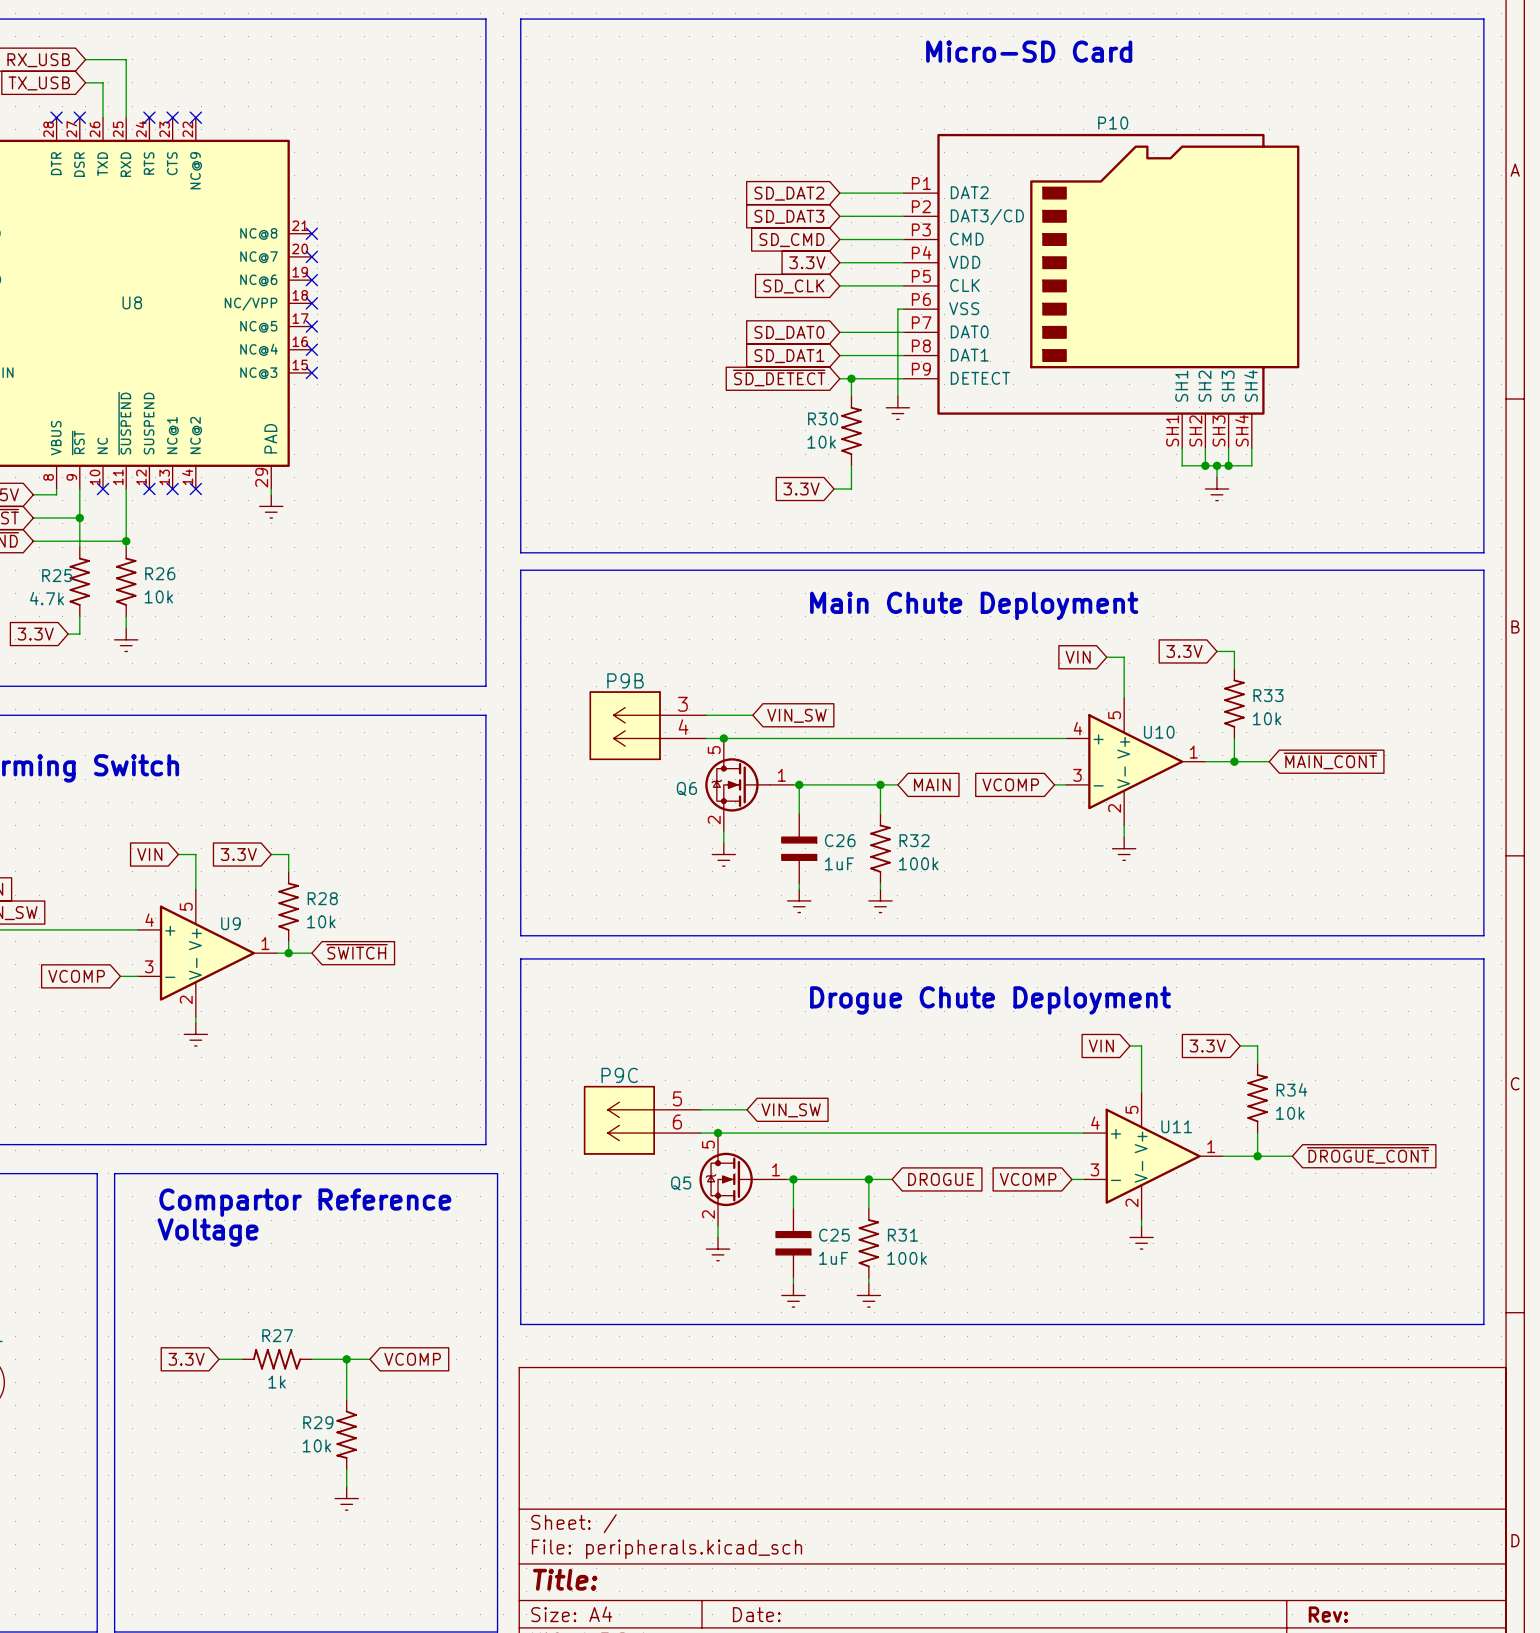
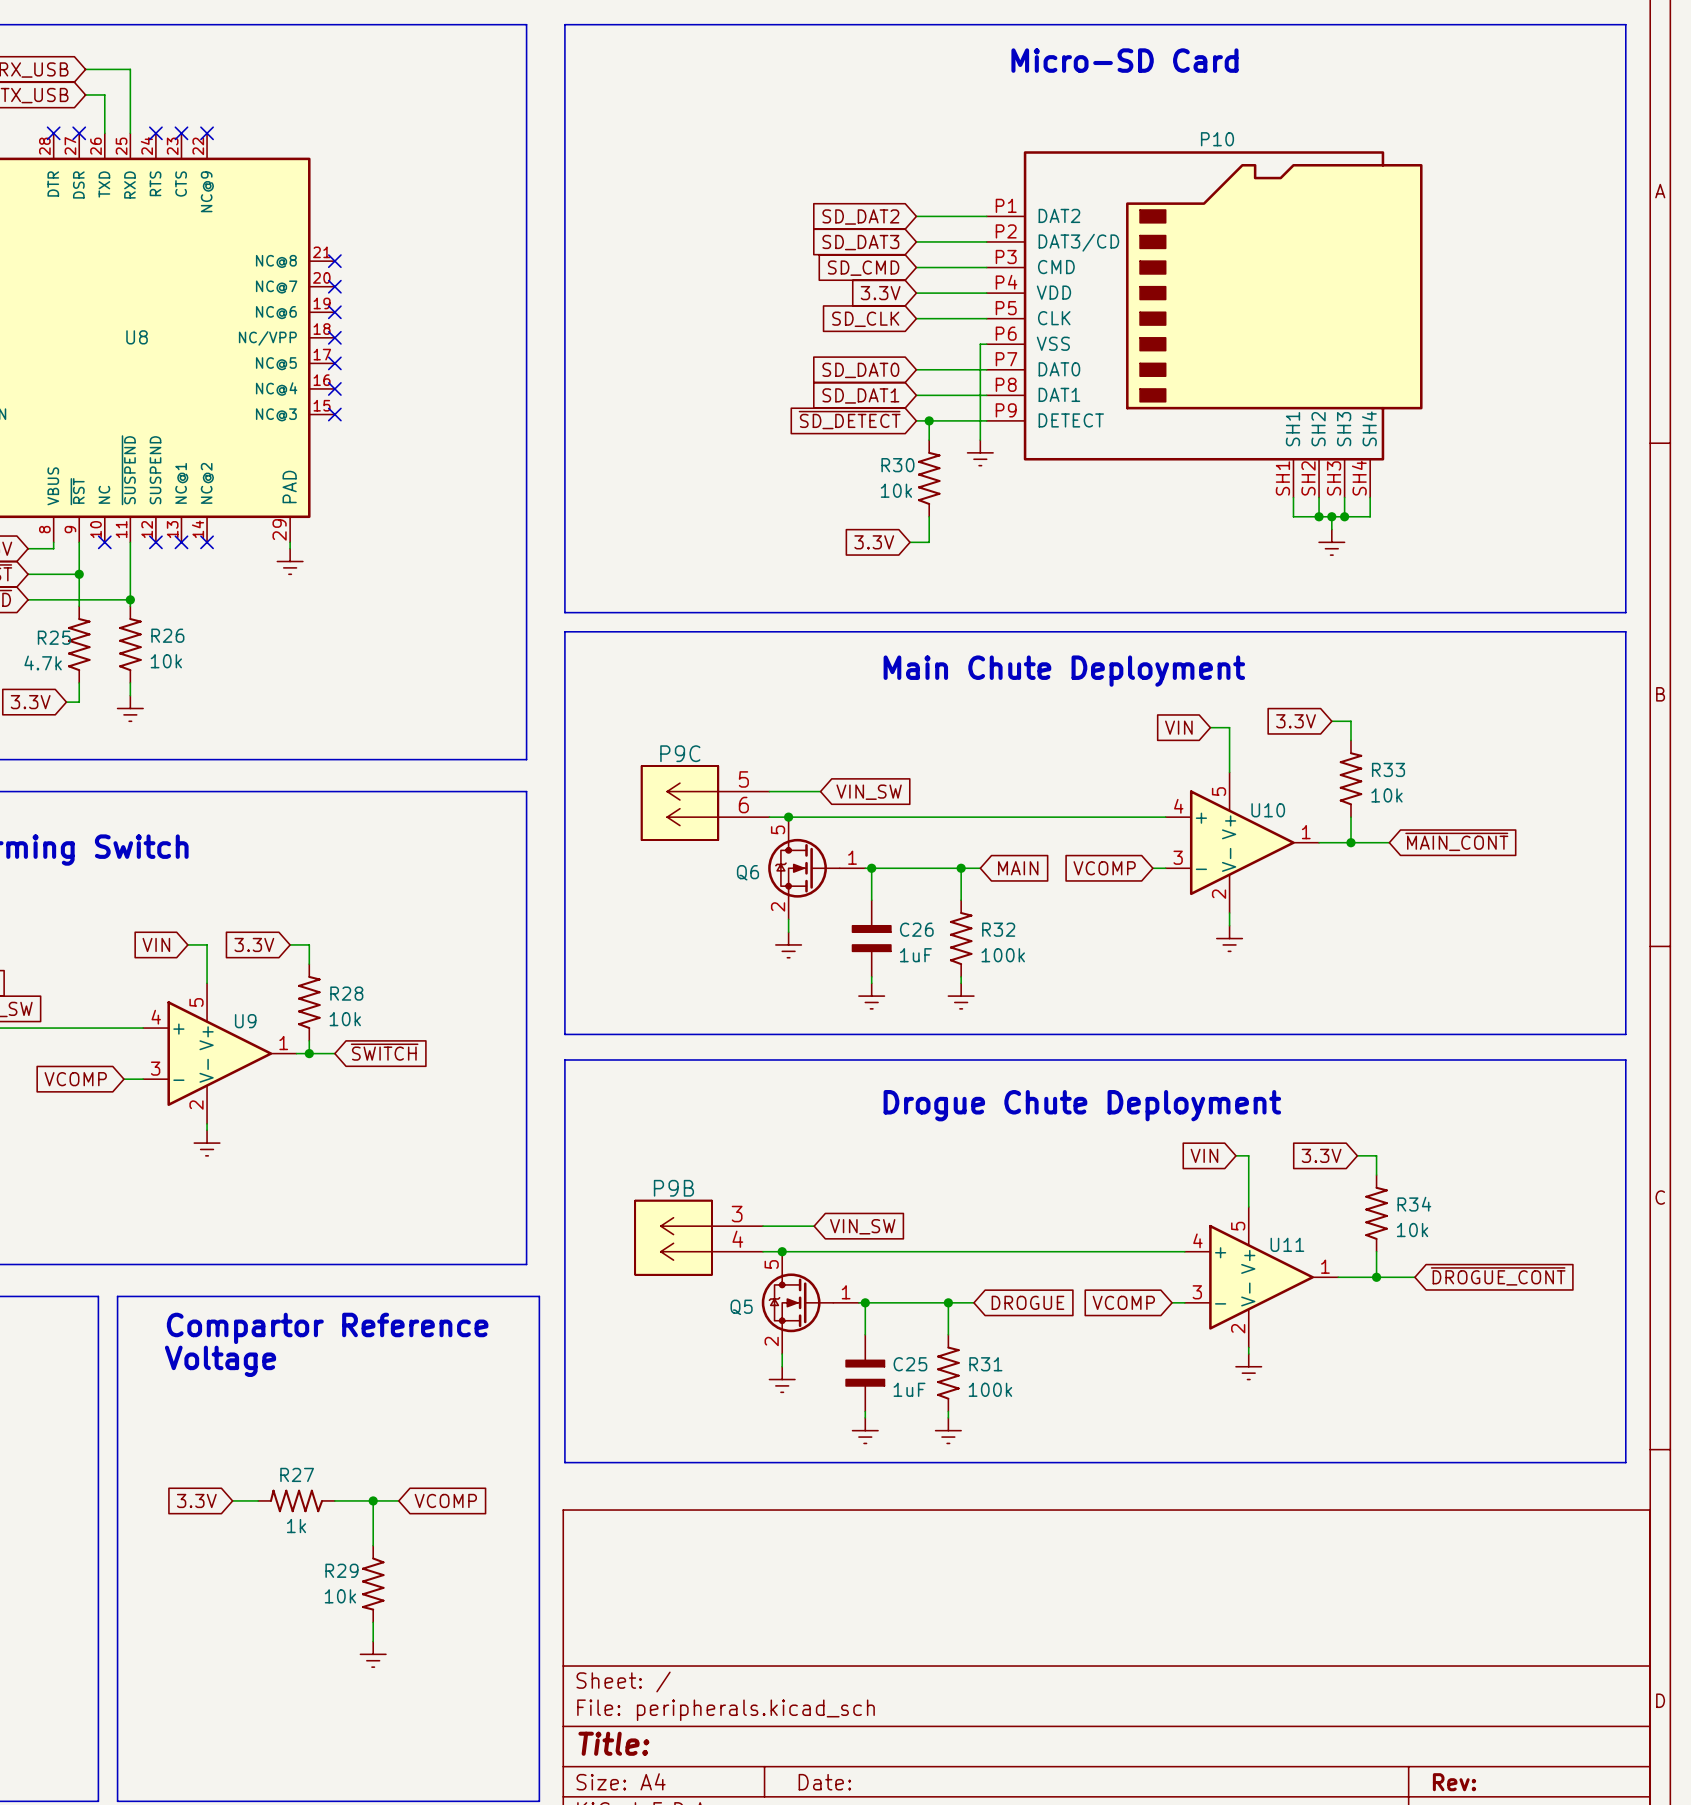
P9B position: (648, 725) -> (698, 1237)
P9C position: (642, 1120) -> (705, 803)

